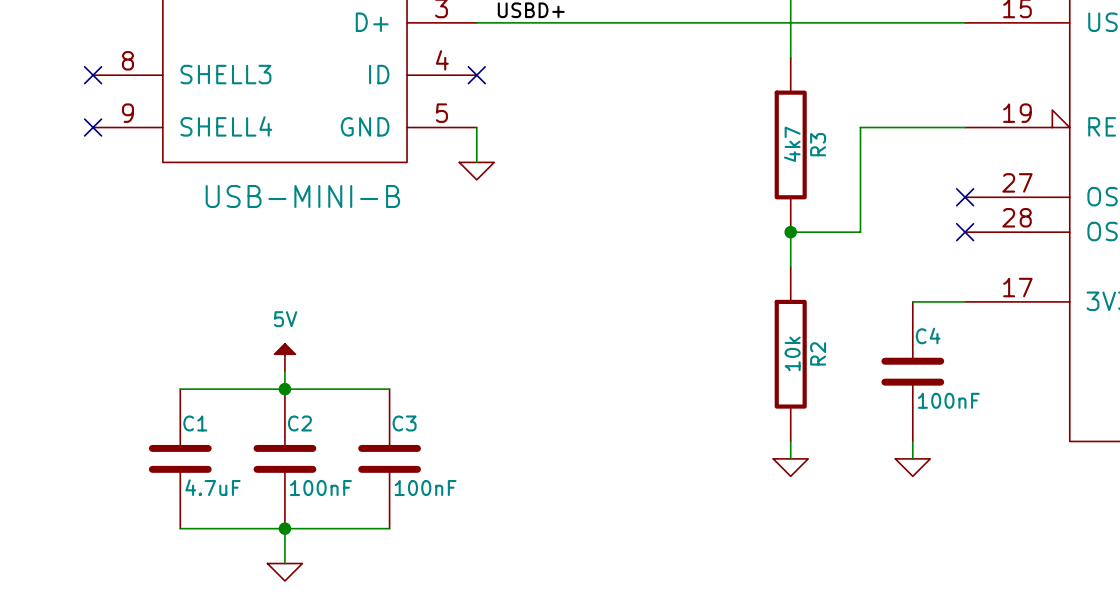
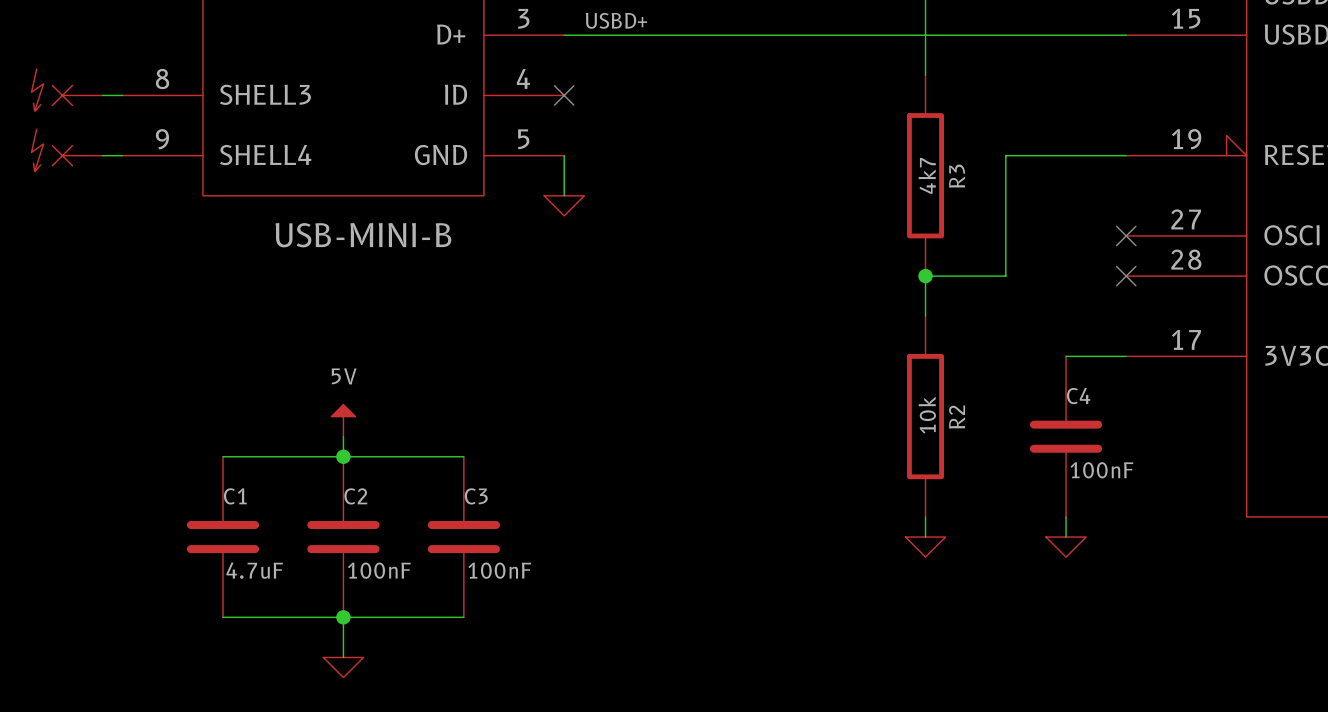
part: none -> (67, 90)
wire: none -> (102, 95) (122, 95)
no-connect mark: (93, 75) -> none
part: none -> (67, 150)
wire: none -> (102, 155) (122, 155)
no-connect mark: (93, 127) -> none

